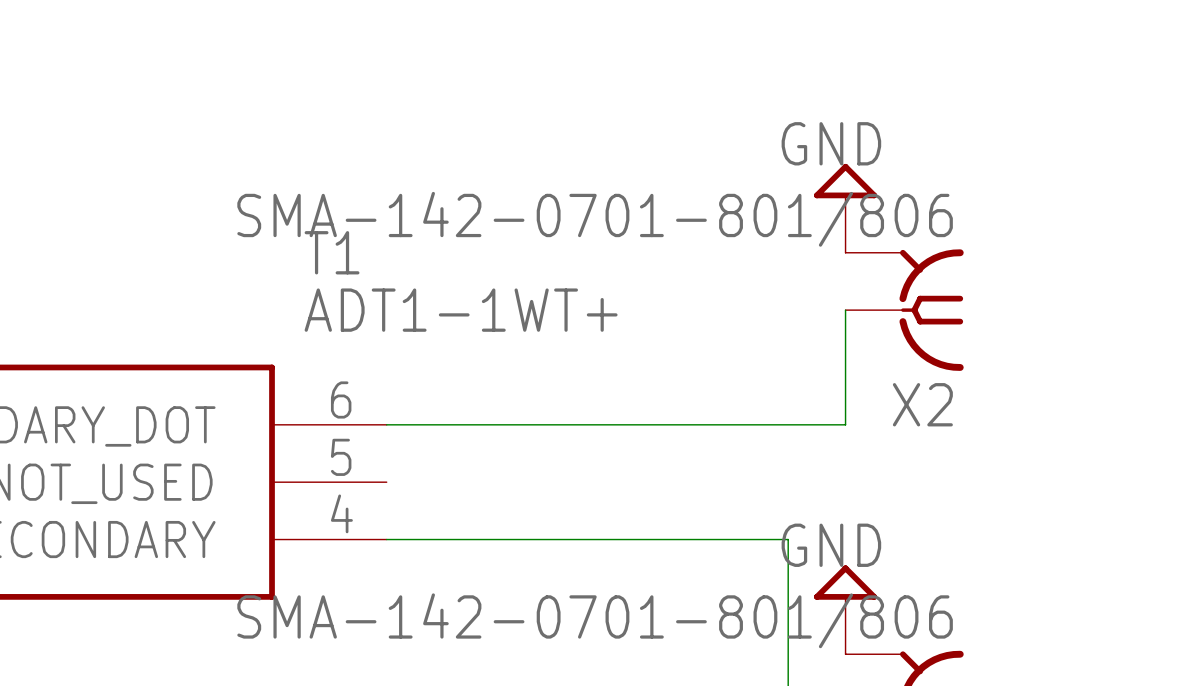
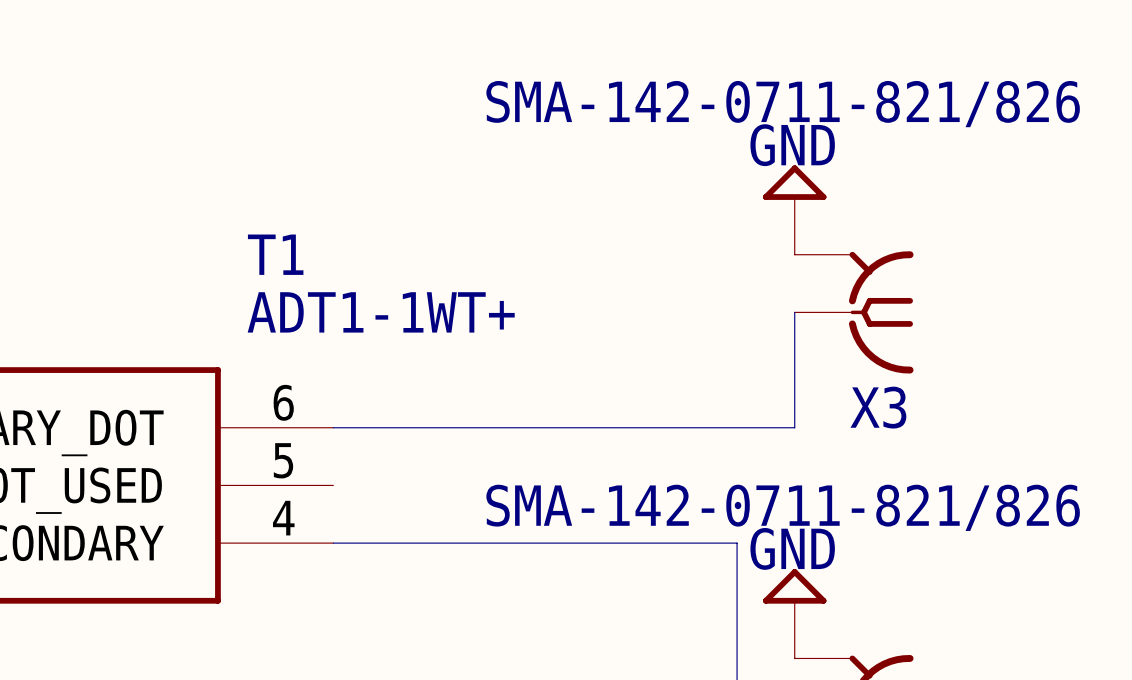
X2 value: SMA-142-0701-801/806 (595, 219) -> SMA-142-0711-821/826 (783, 104)
X2 name: X2 (922, 404) -> X3 (878, 407)
part value: SMA-142-0701-801/806 (595, 620) -> SMA-142-0711-821/826 (783, 507)

